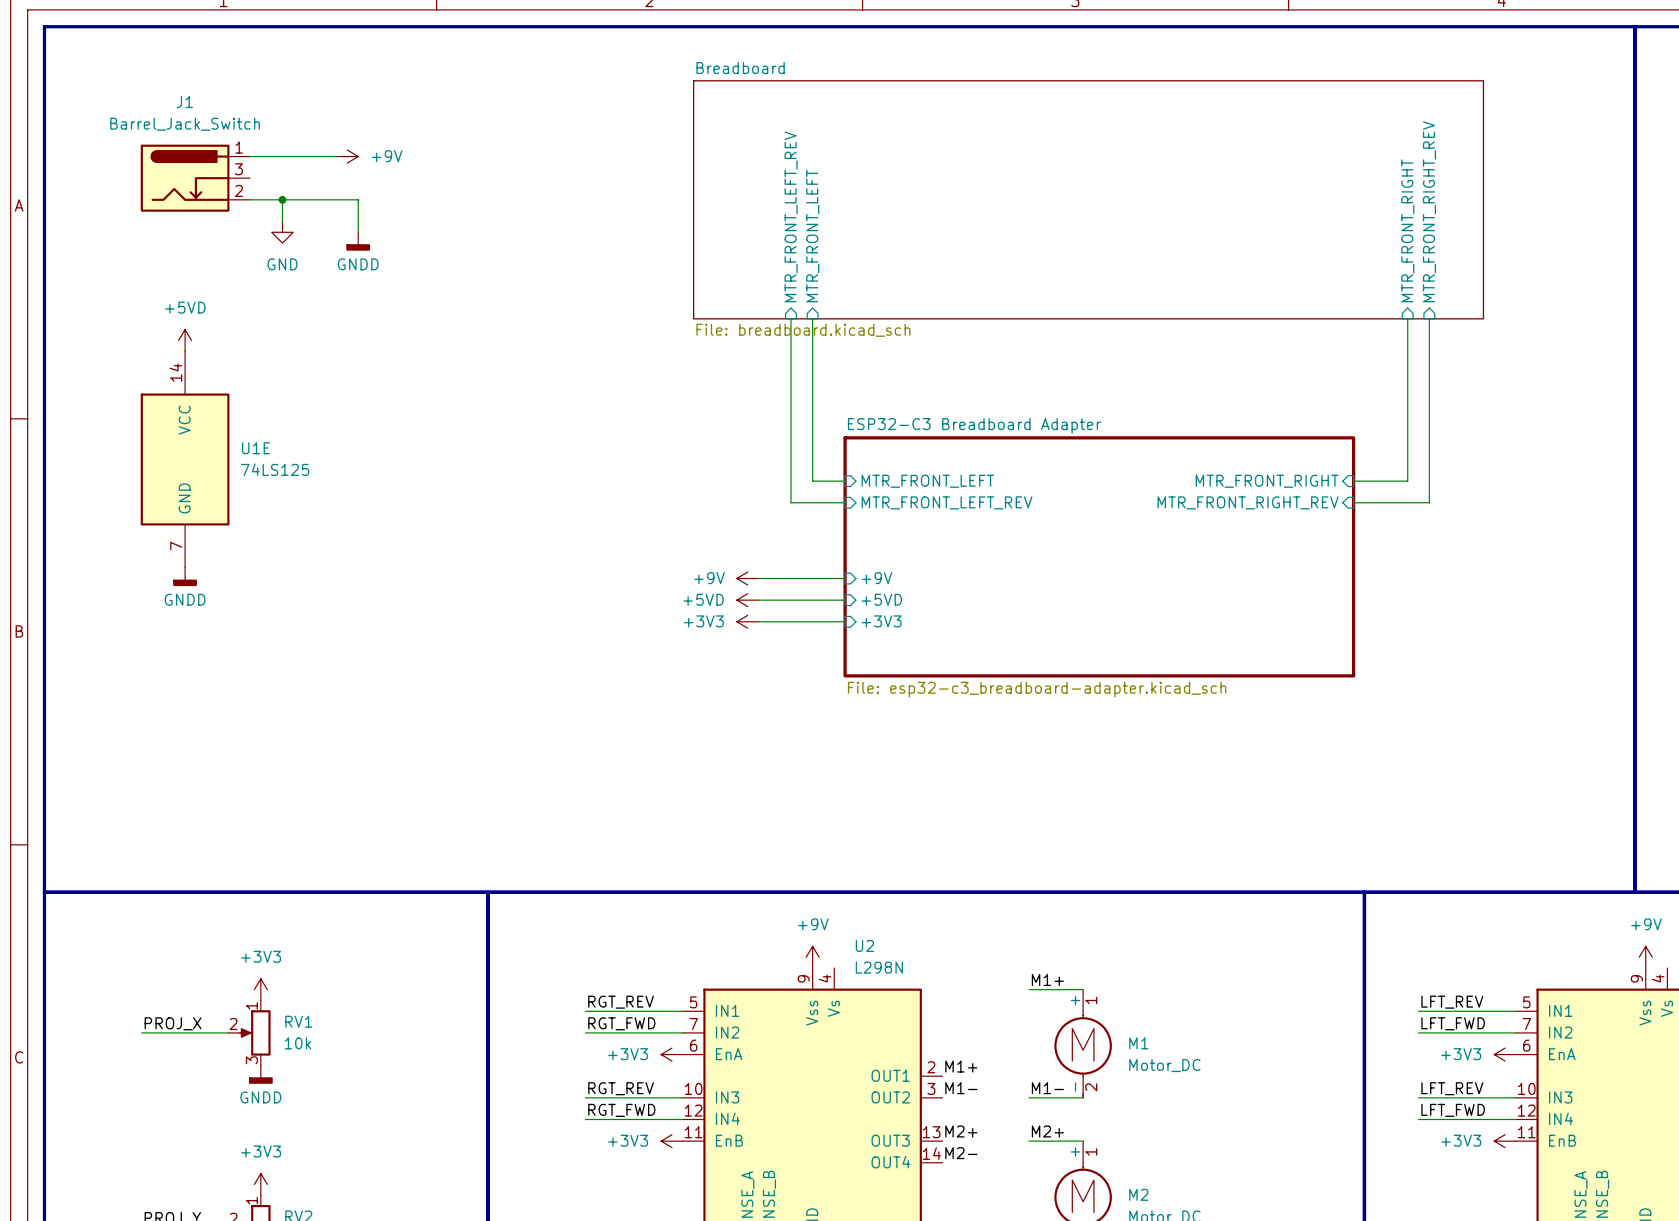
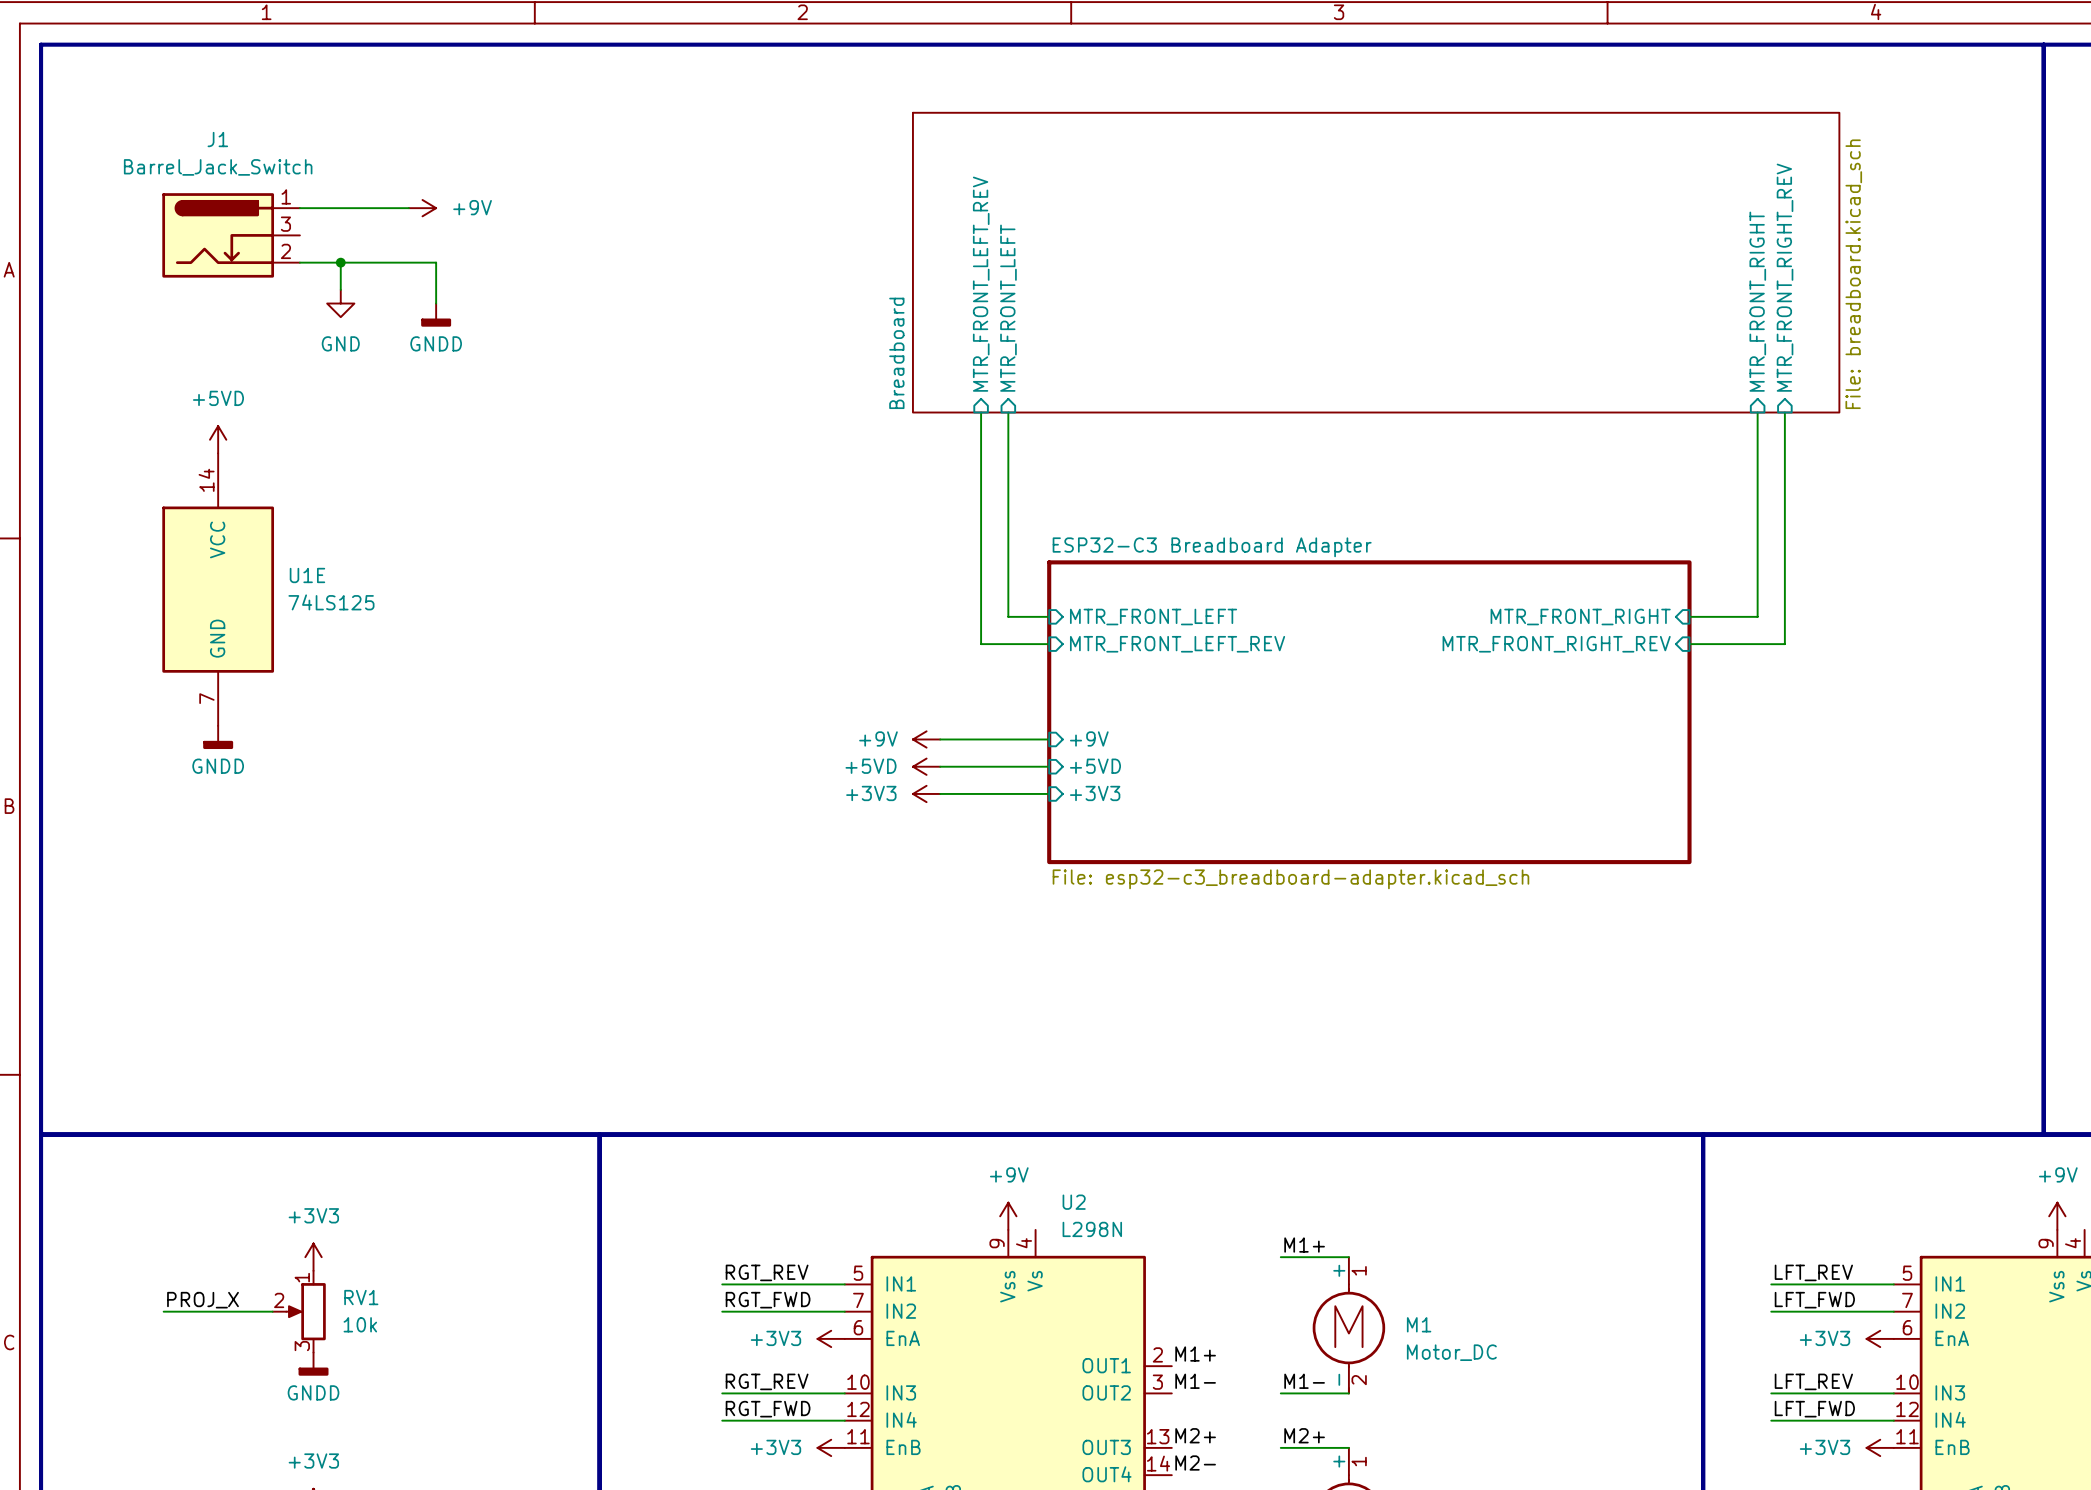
sheet Breadboard: File: breadboard.kicad_sch (1088, 199) -> none
sheet Breadboard: none -> File: breadboard.kicad_sch (1376, 262)

